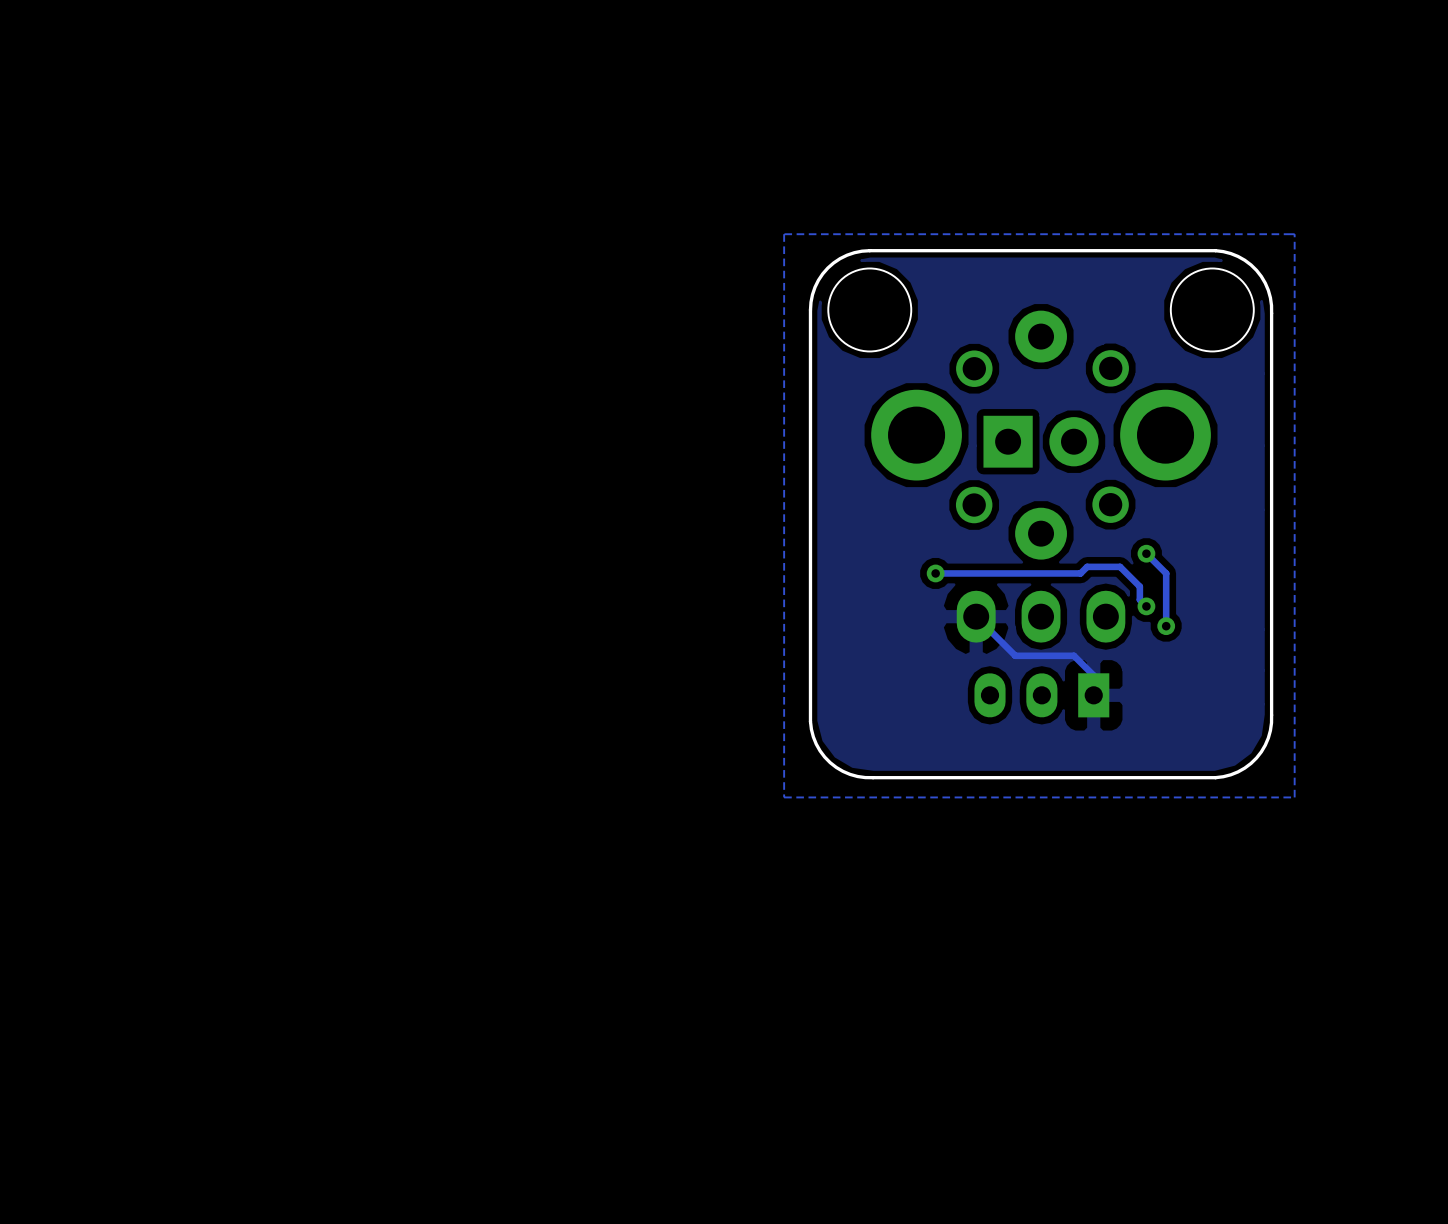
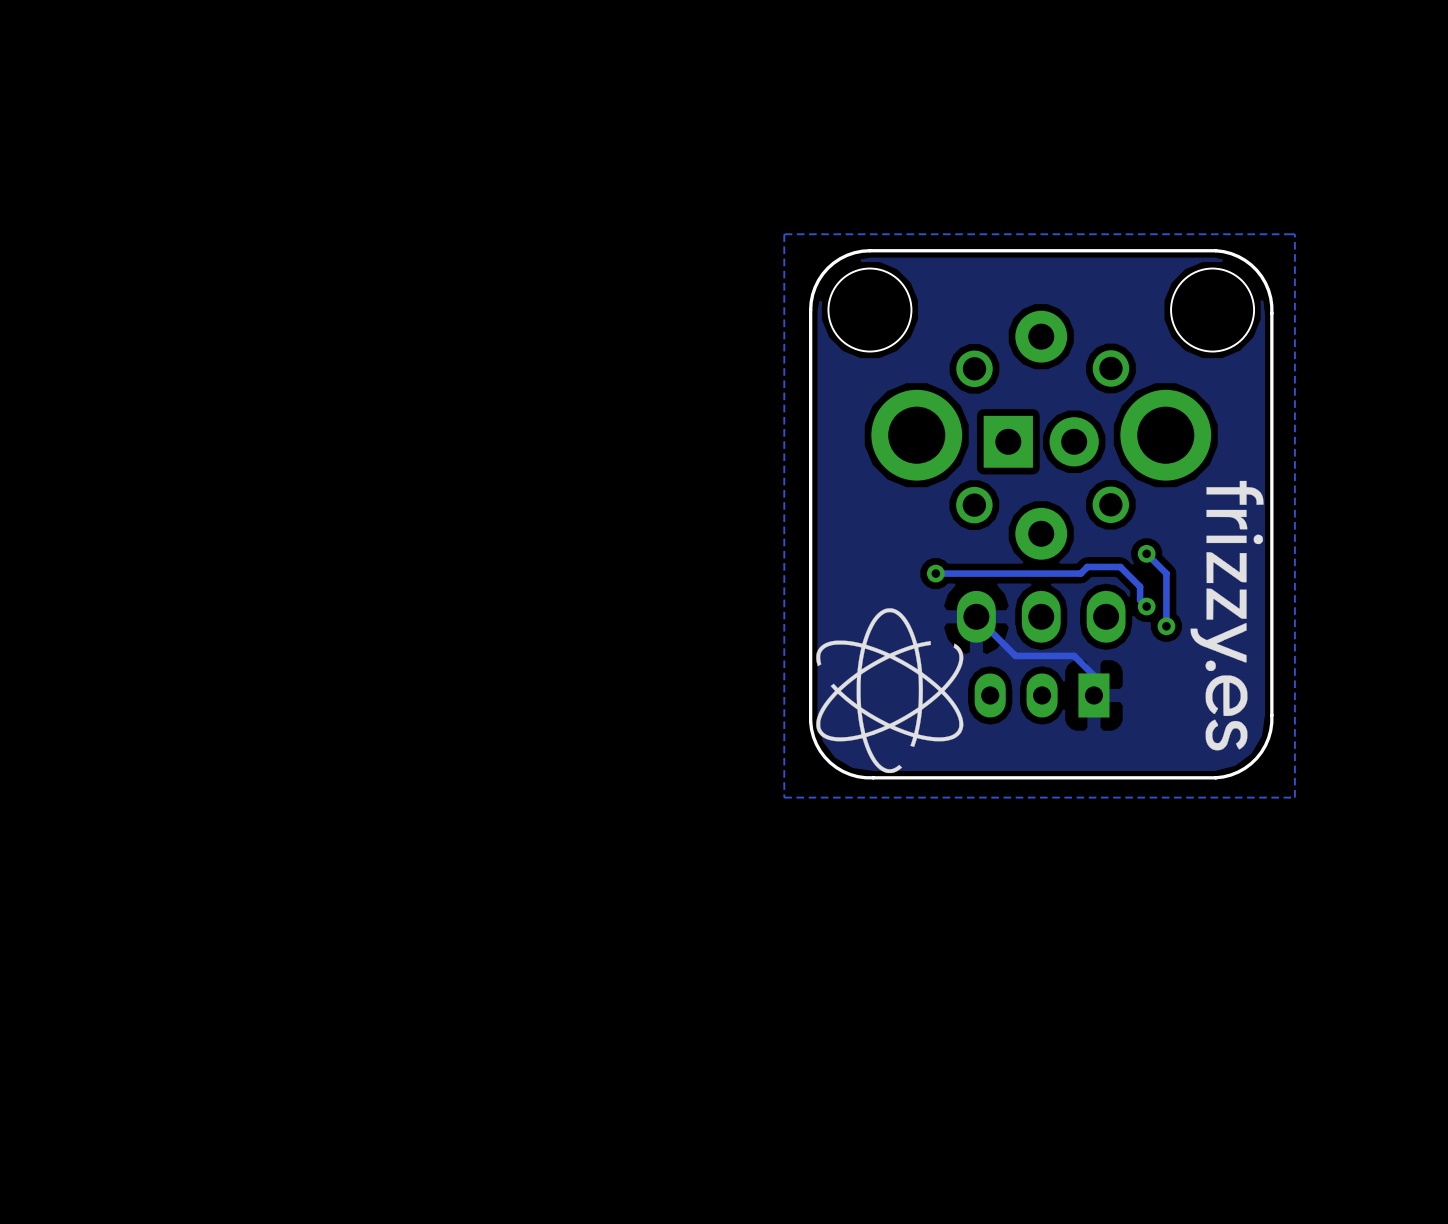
drawing: none -> [1190, 480, 1264, 751]
drawing: none -> [816, 608, 964, 774]

